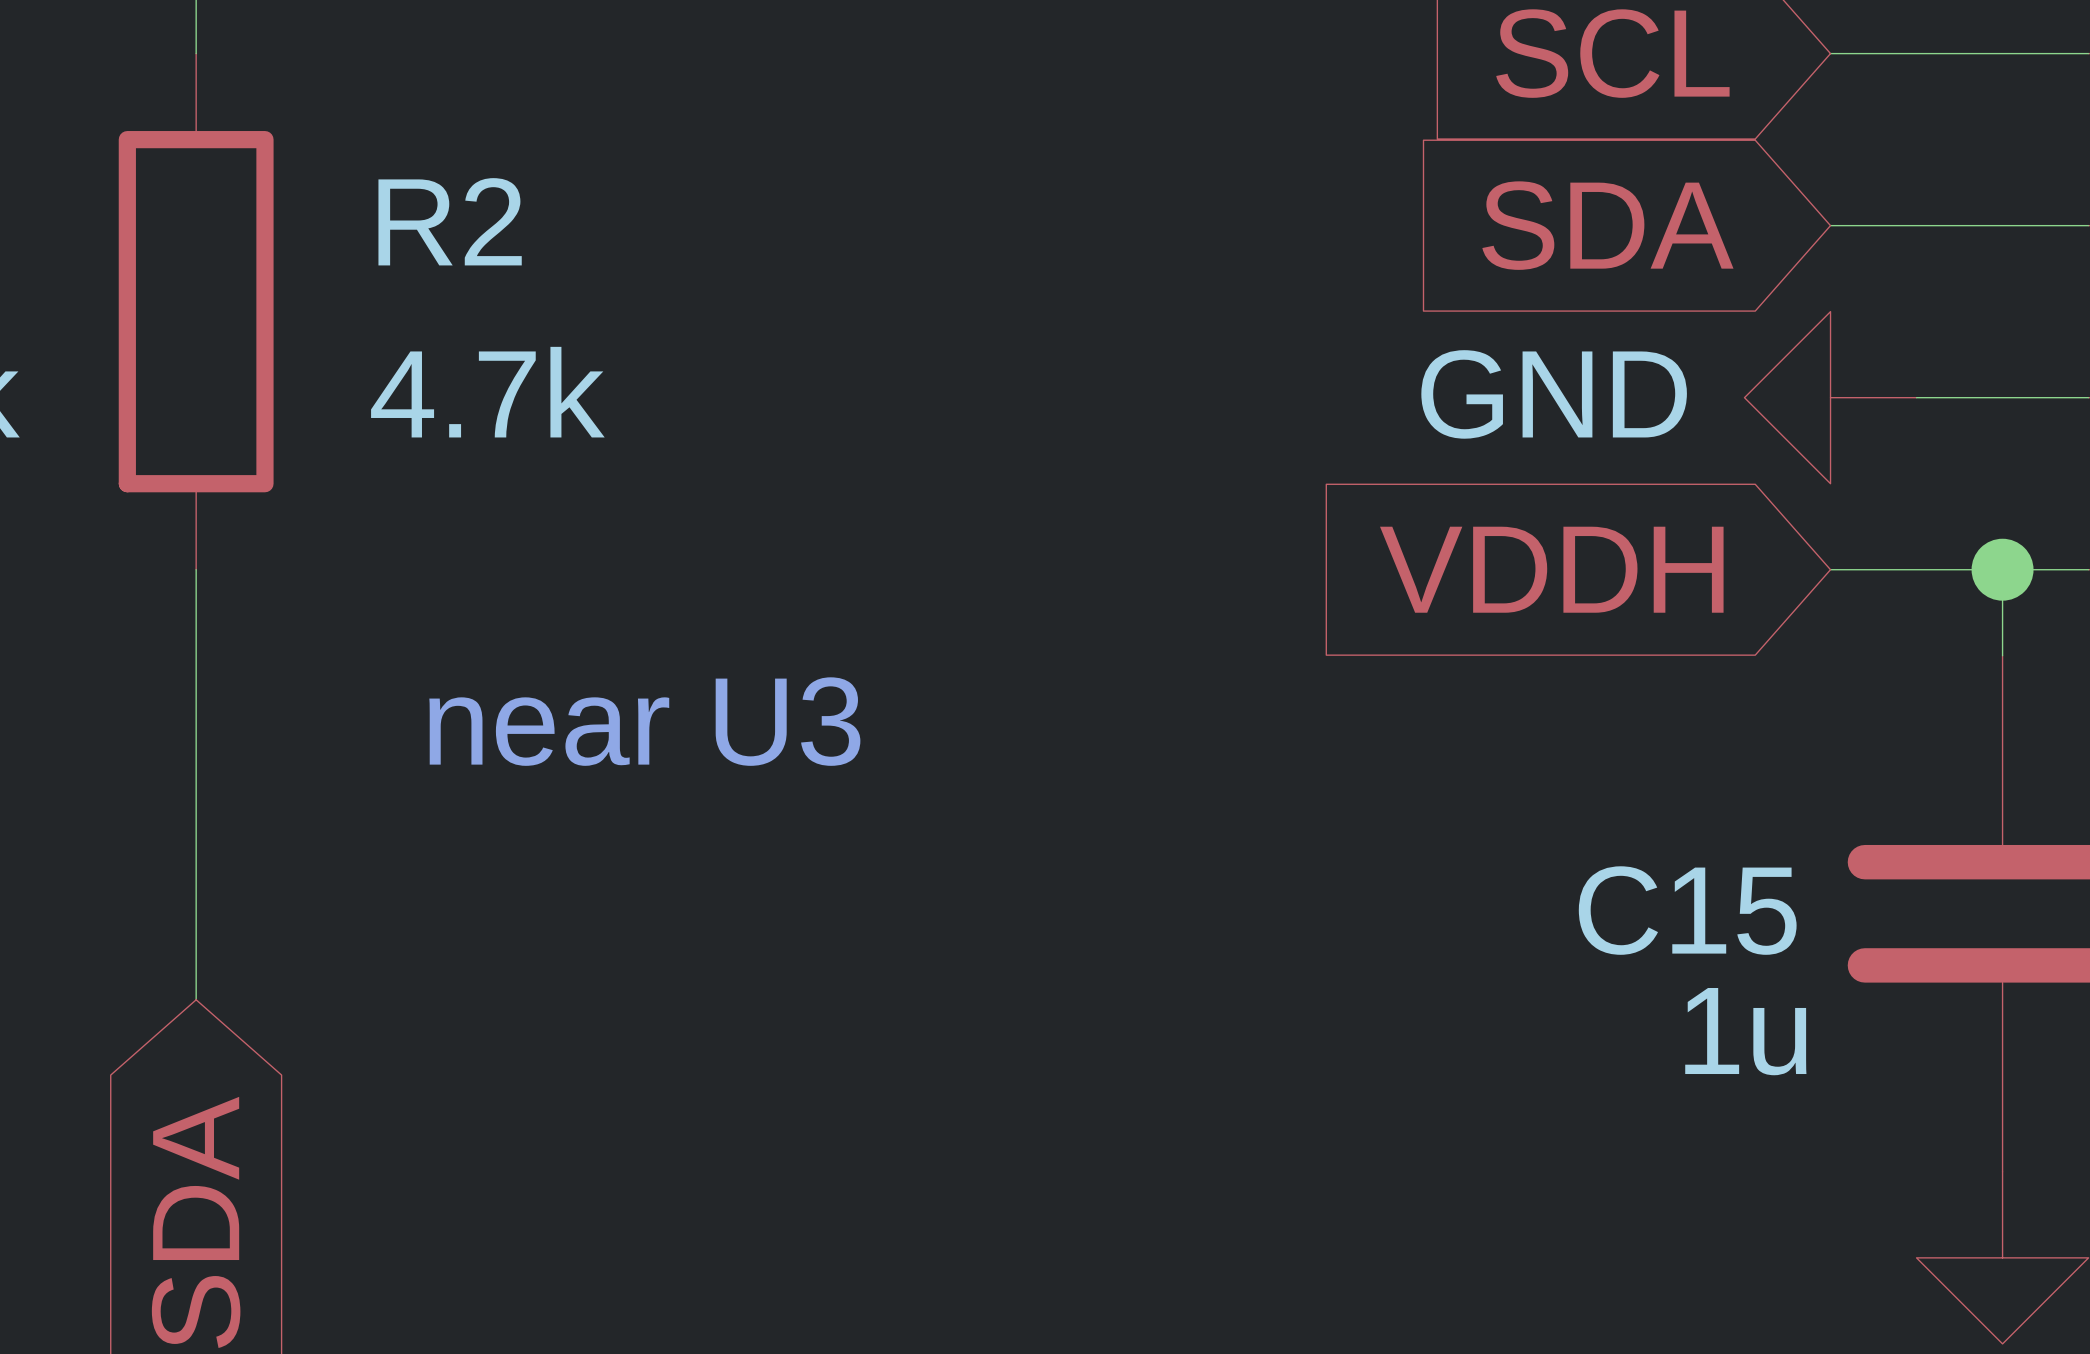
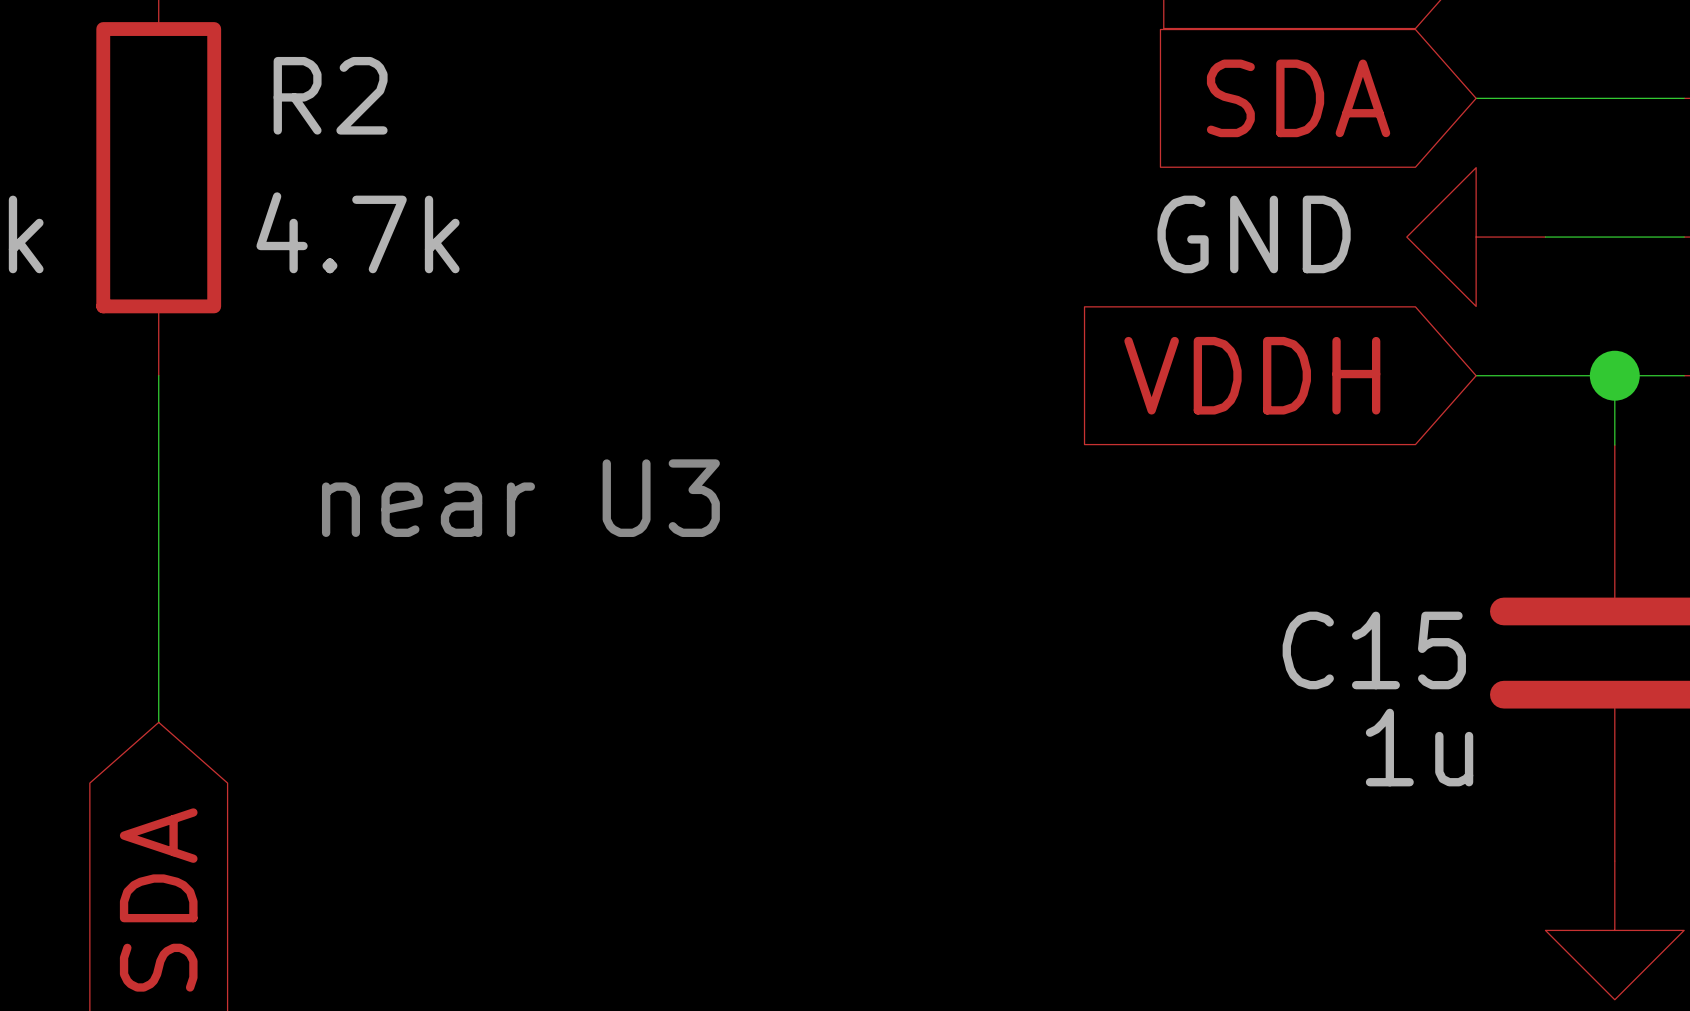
R2 name position: R2 (450, 221) -> R2 (330, 95)
R2 value position: 4.7k (487, 392) -> 4.7k (358, 232)

